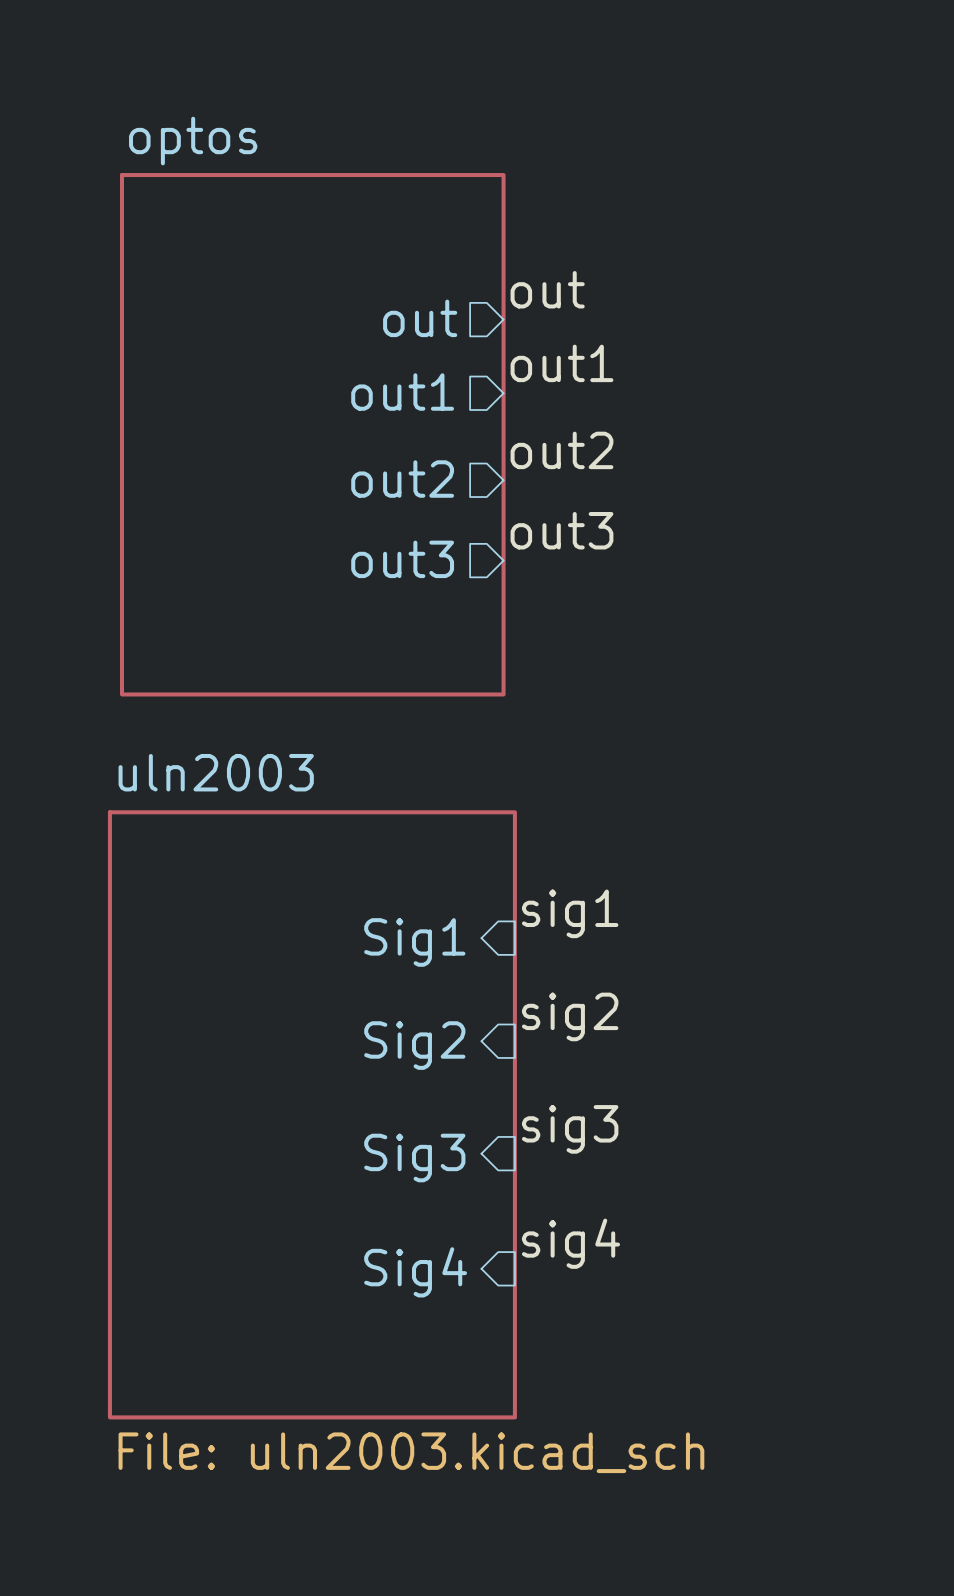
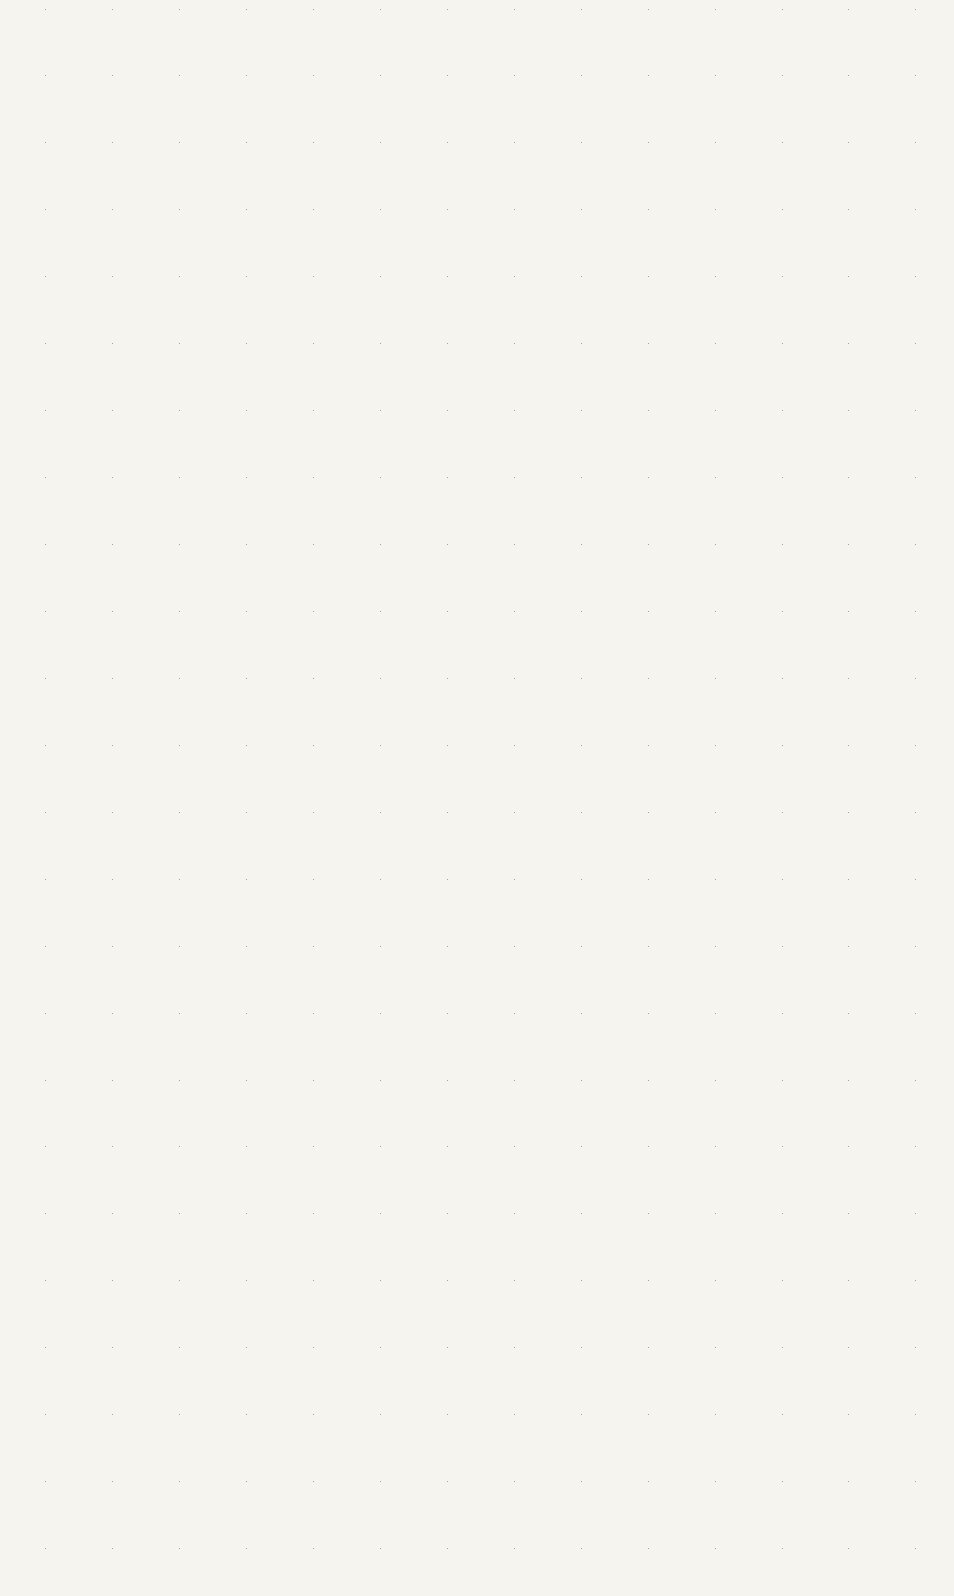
label: out (547, 289) -> none
sheet pin: out (420, 318) -> none
label: out1 (561, 363) -> none
sheet pin: out1 (402, 392) -> none
sheet optos: (312, 434) -> none
label: out2 (561, 450) -> none
sheet pin: out2 (402, 479) -> none
label: out3 (561, 530) -> none
sheet pin: out3 (402, 559) -> none
label: sig1 (570, 913) -> none
sheet pin: Sig1 (414, 942) -> none
label: sig2 (570, 1016) -> none
sheet pin: Sig2 (414, 1045) -> none
sheet uln2003: File: uln2003.kicad_sch (312, 1114) -> none
label: sig3 (570, 1129) -> none
sheet pin: Sig3 (414, 1158) -> none
label: sig4 (570, 1243) -> none
sheet pin: Sig4 (415, 1272) -> none

